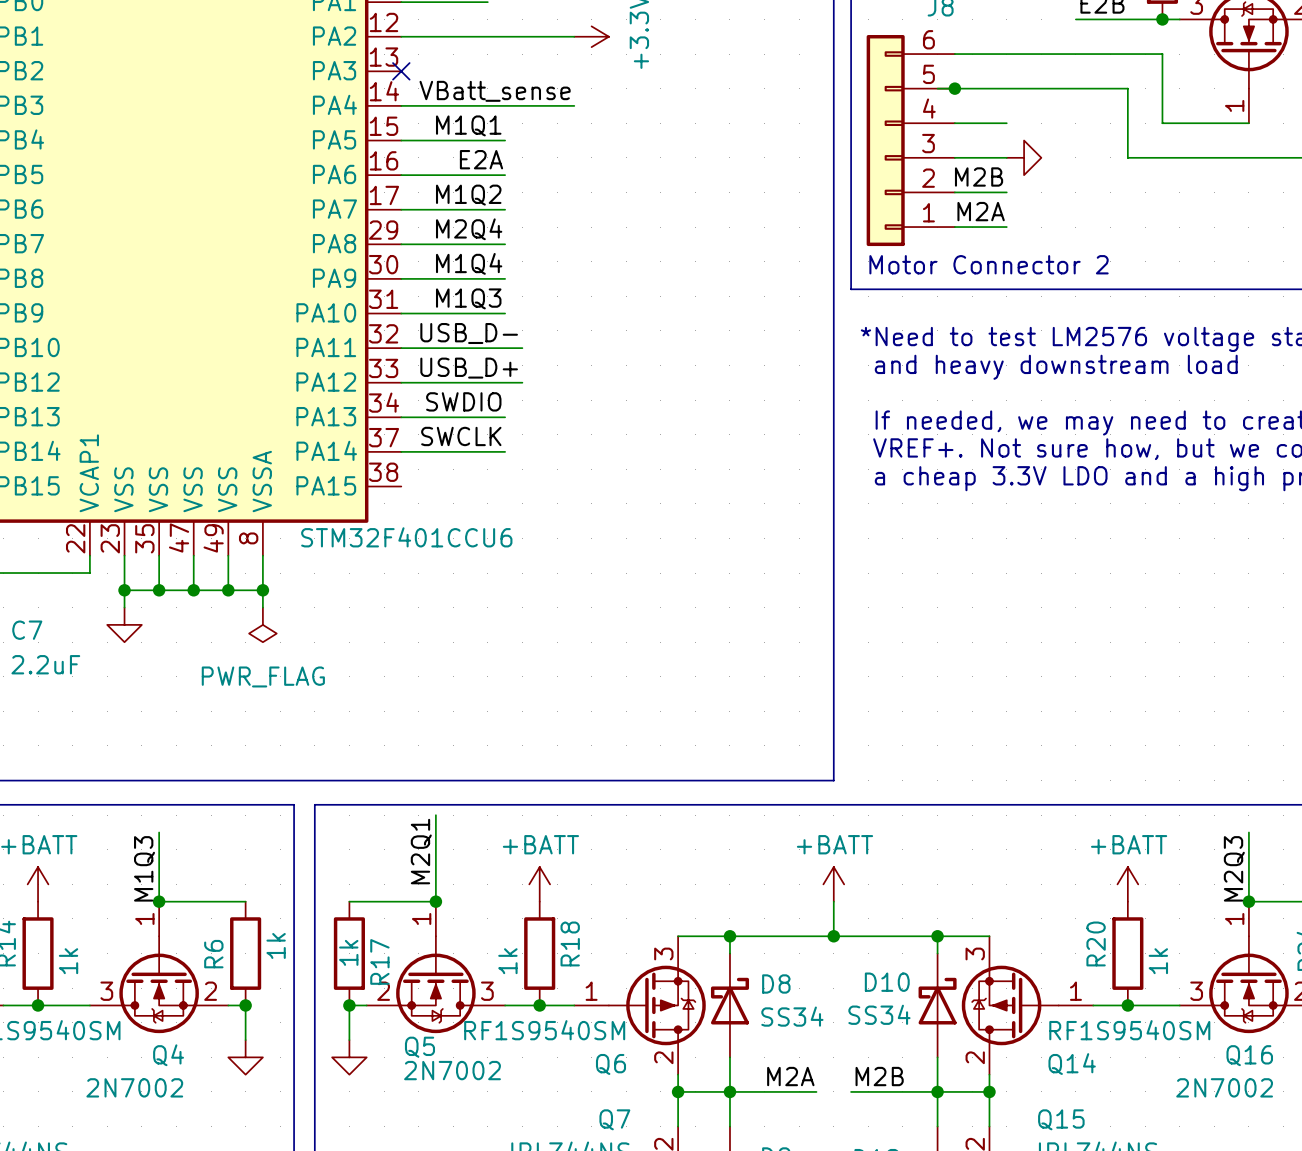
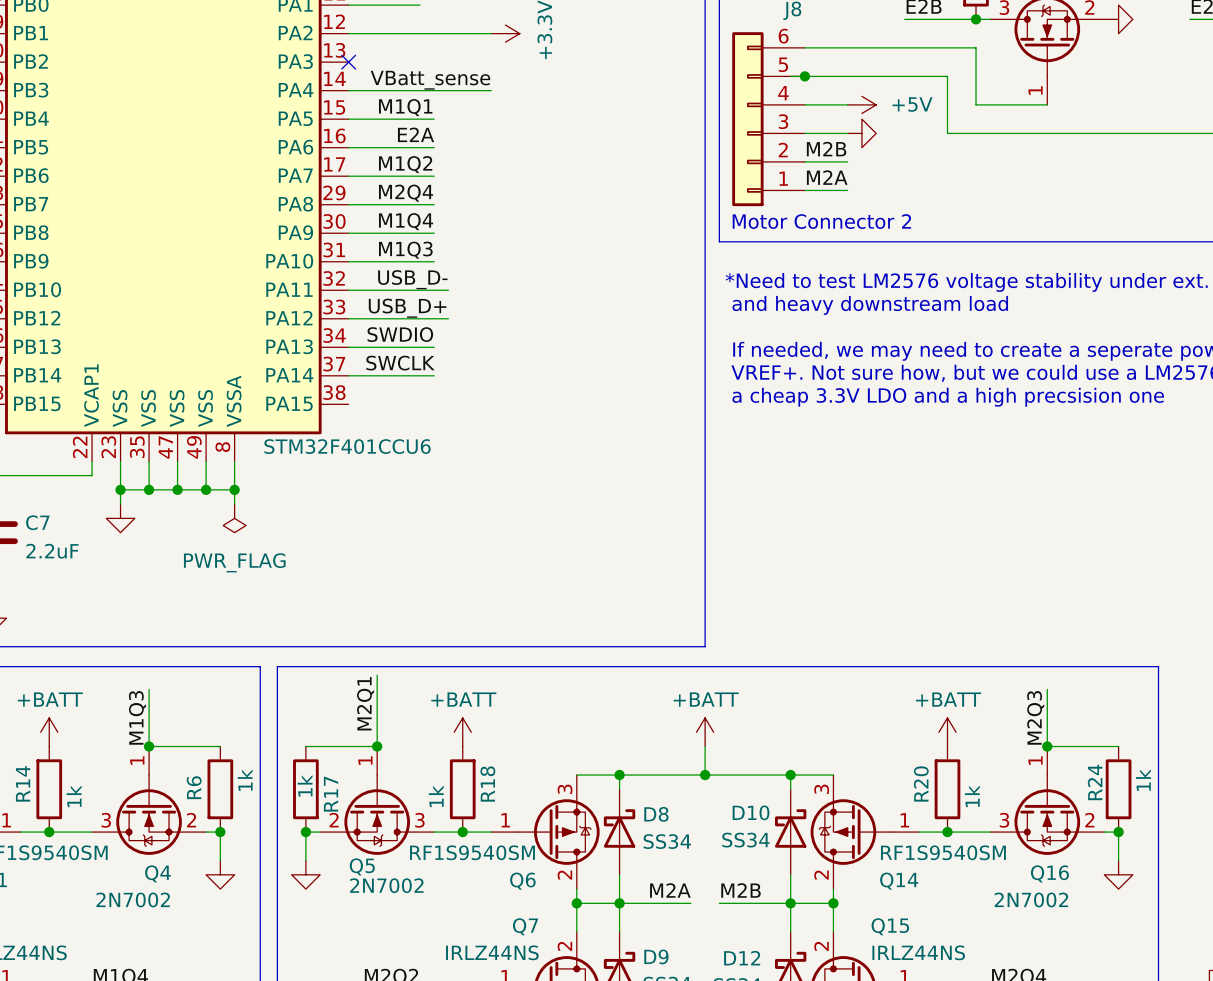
power symbol: none -> +5V (861, 104)

